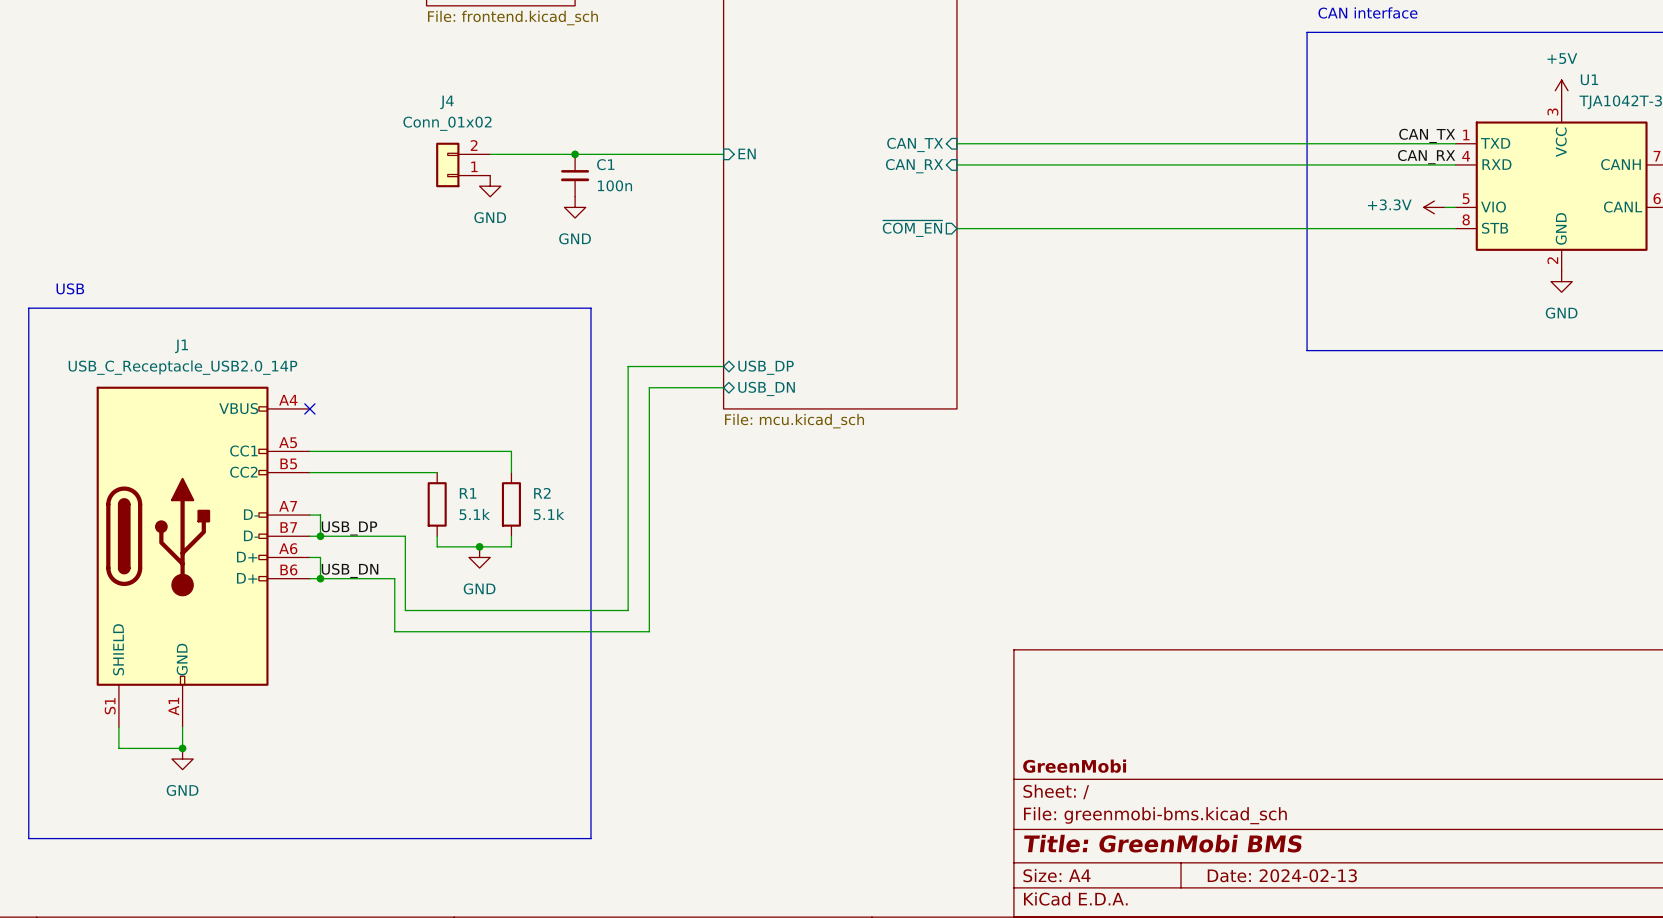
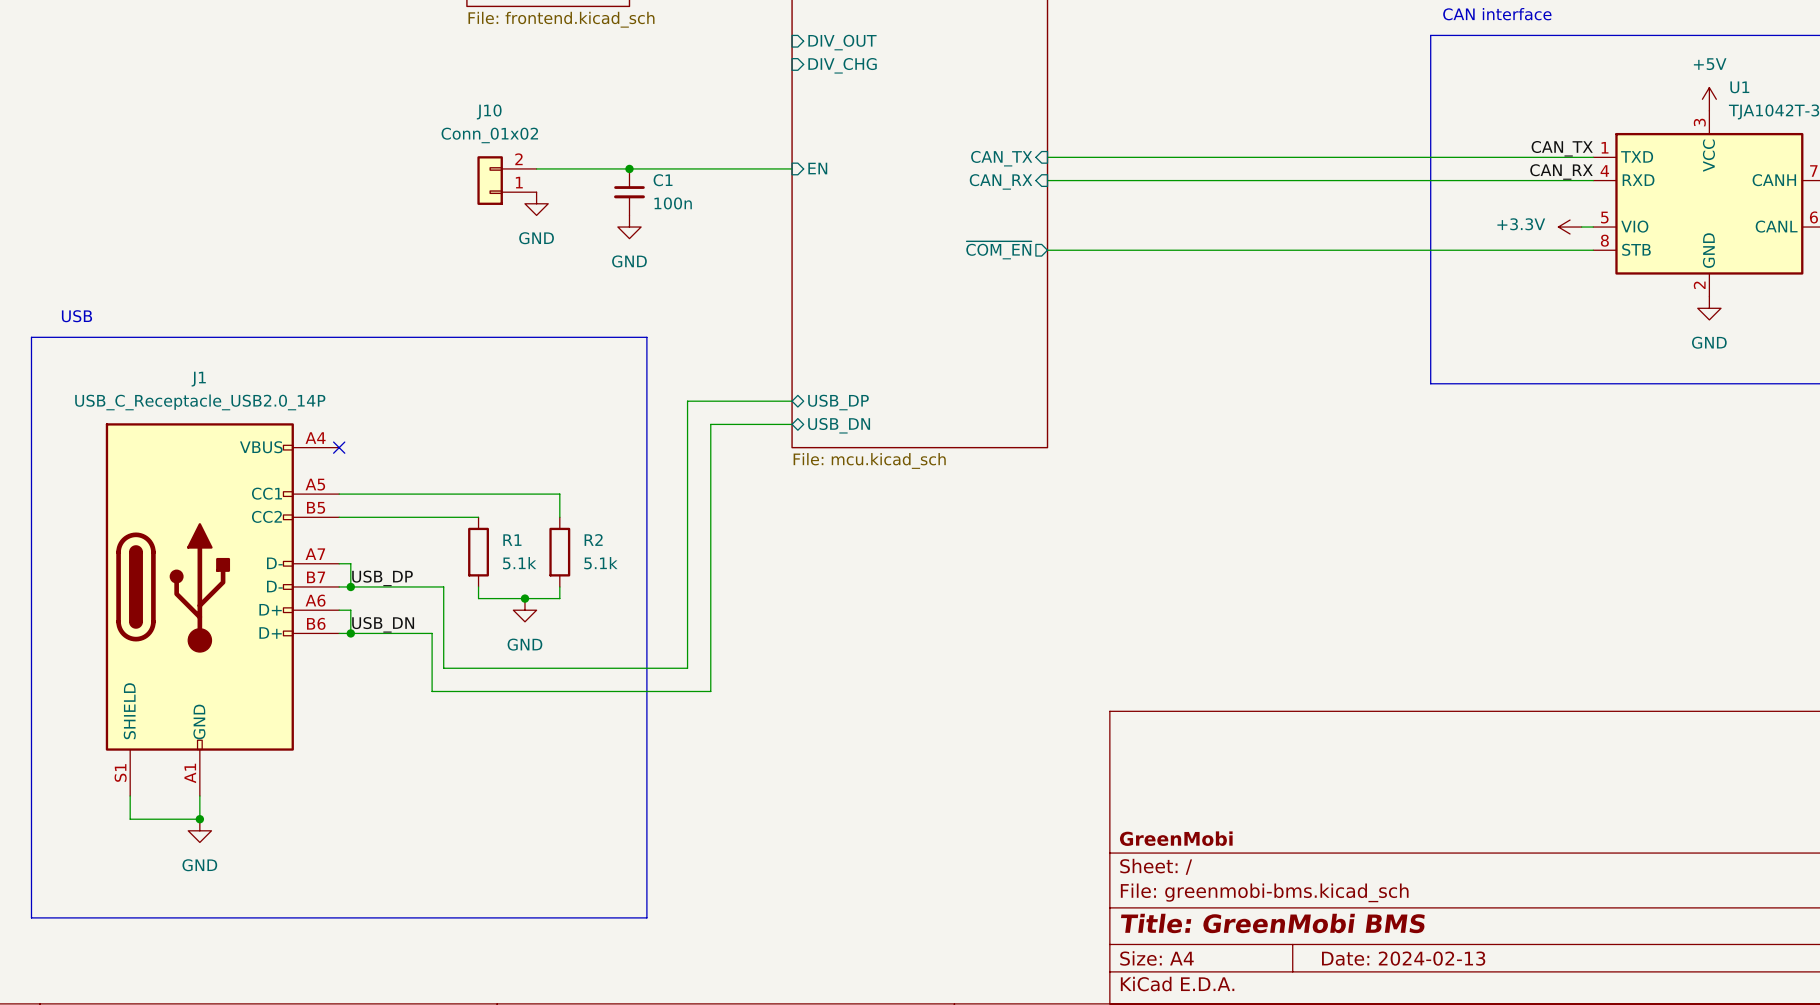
sheet pin: none -> DIV_OUT (842, 42)
sheet pin: none -> DIV_CHG (842, 65)
J4 name: J4 (447, 102) -> J10 (489, 111)

